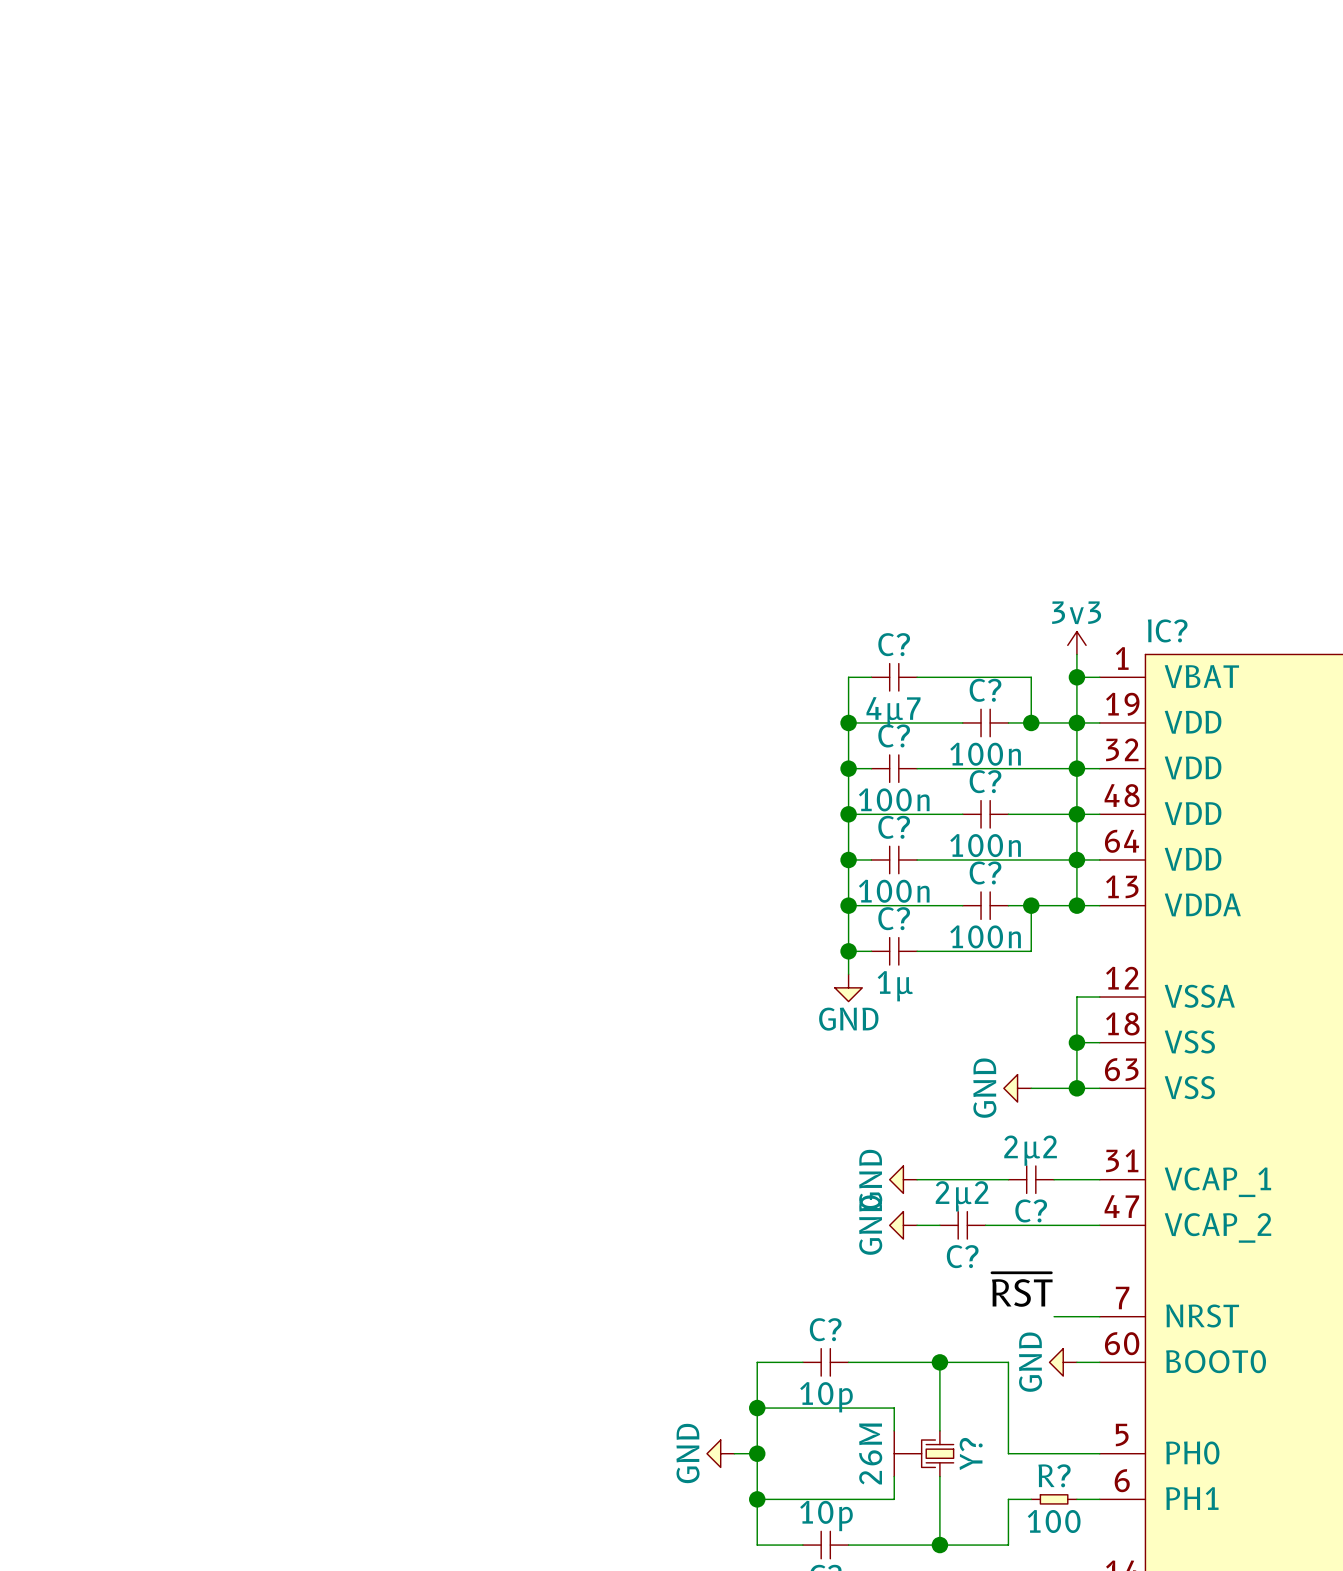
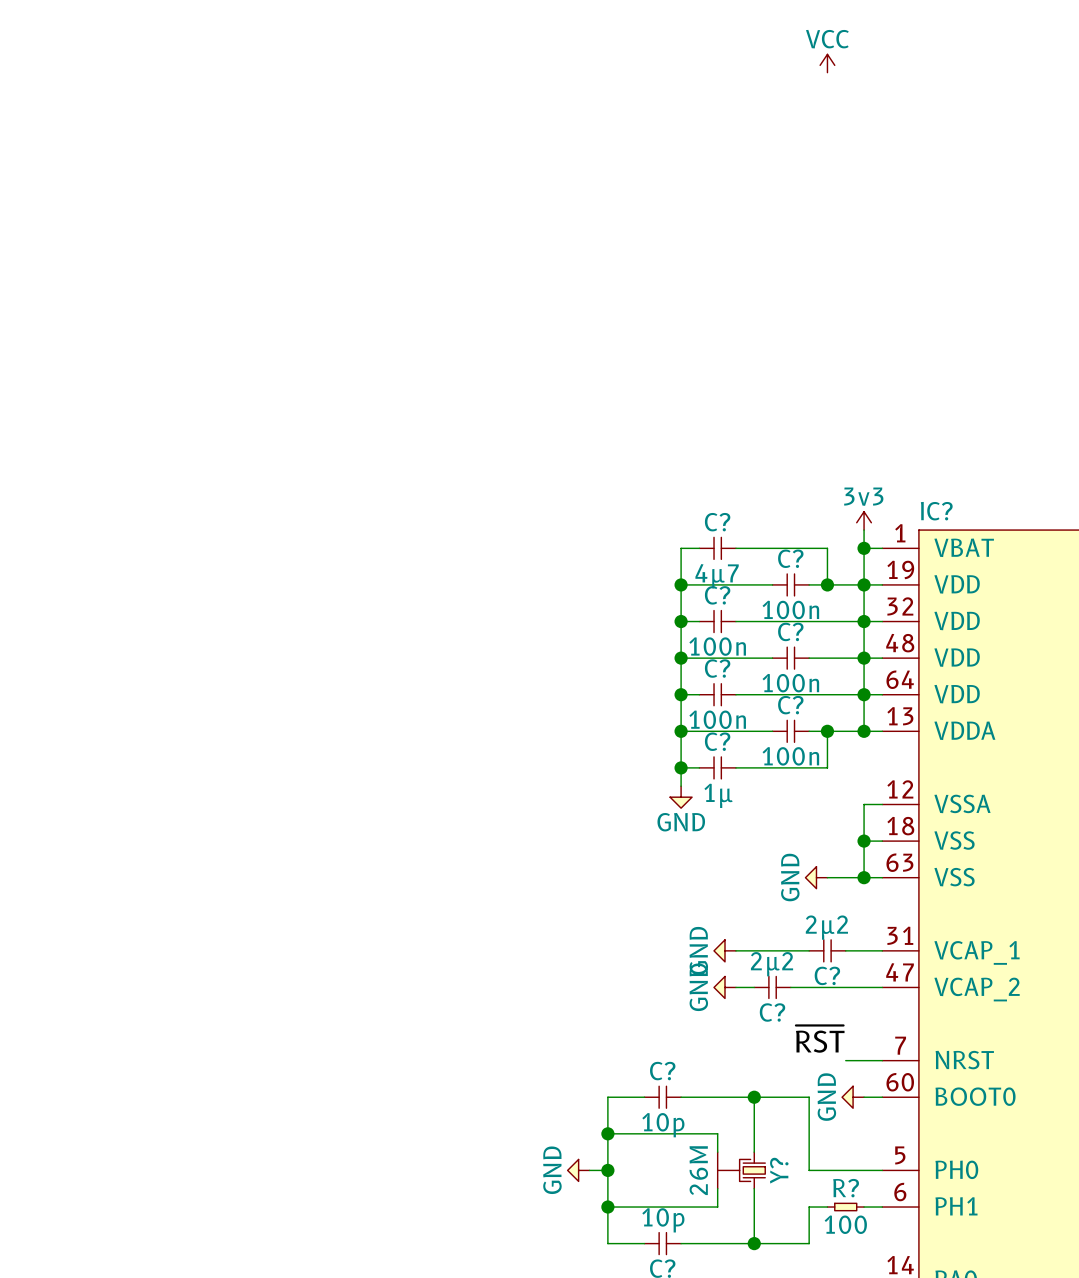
power symbol: none -> VCC (827, 63)

